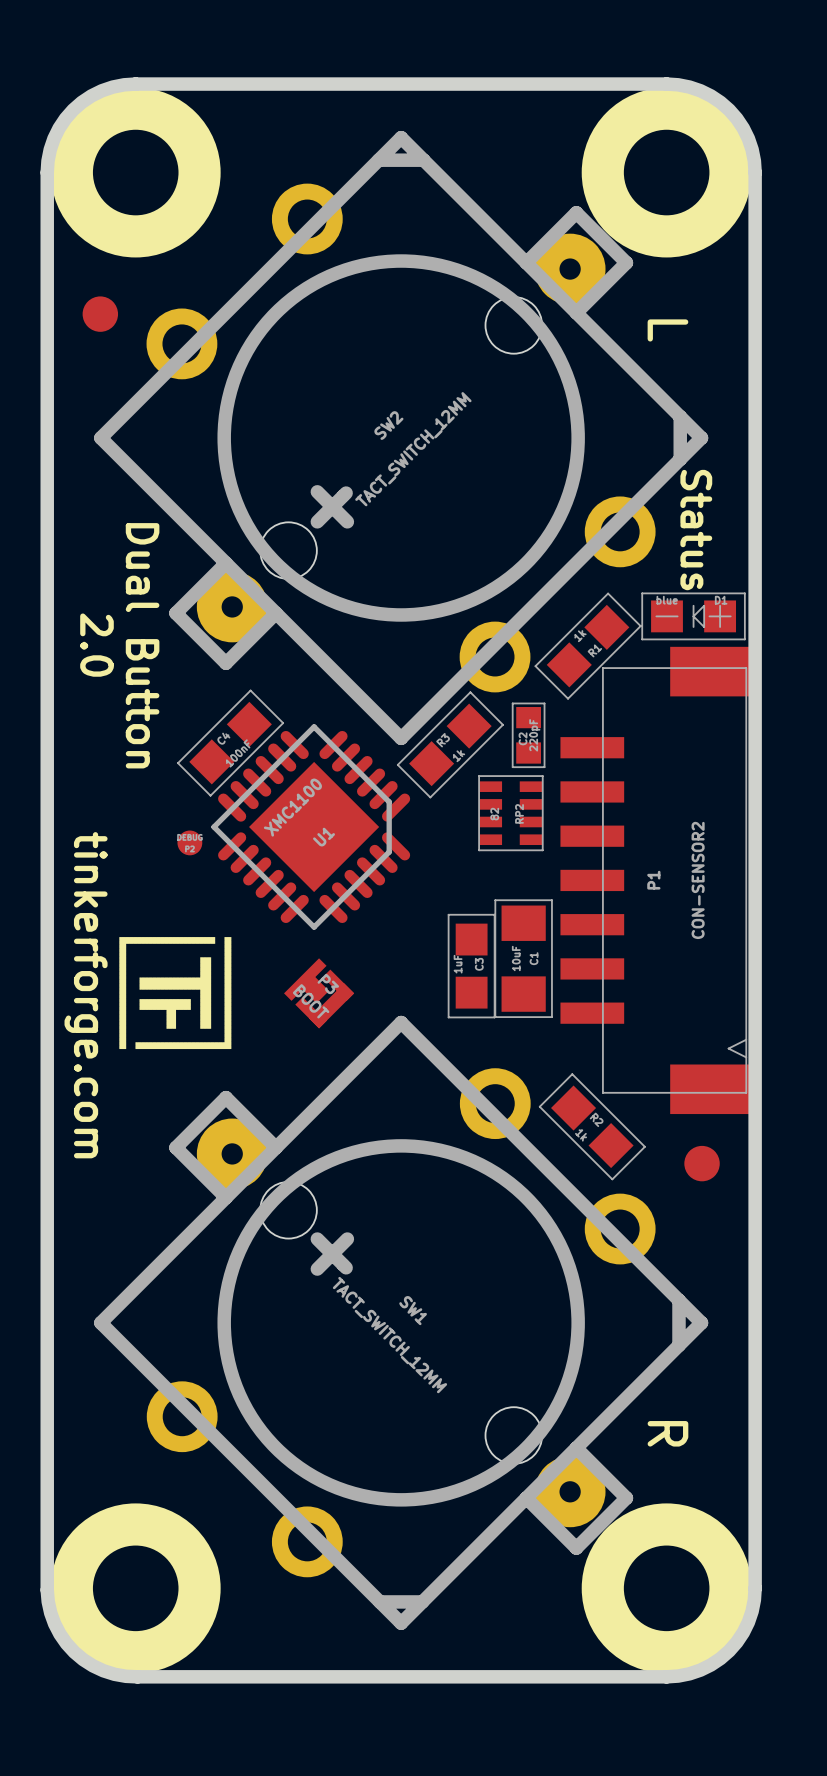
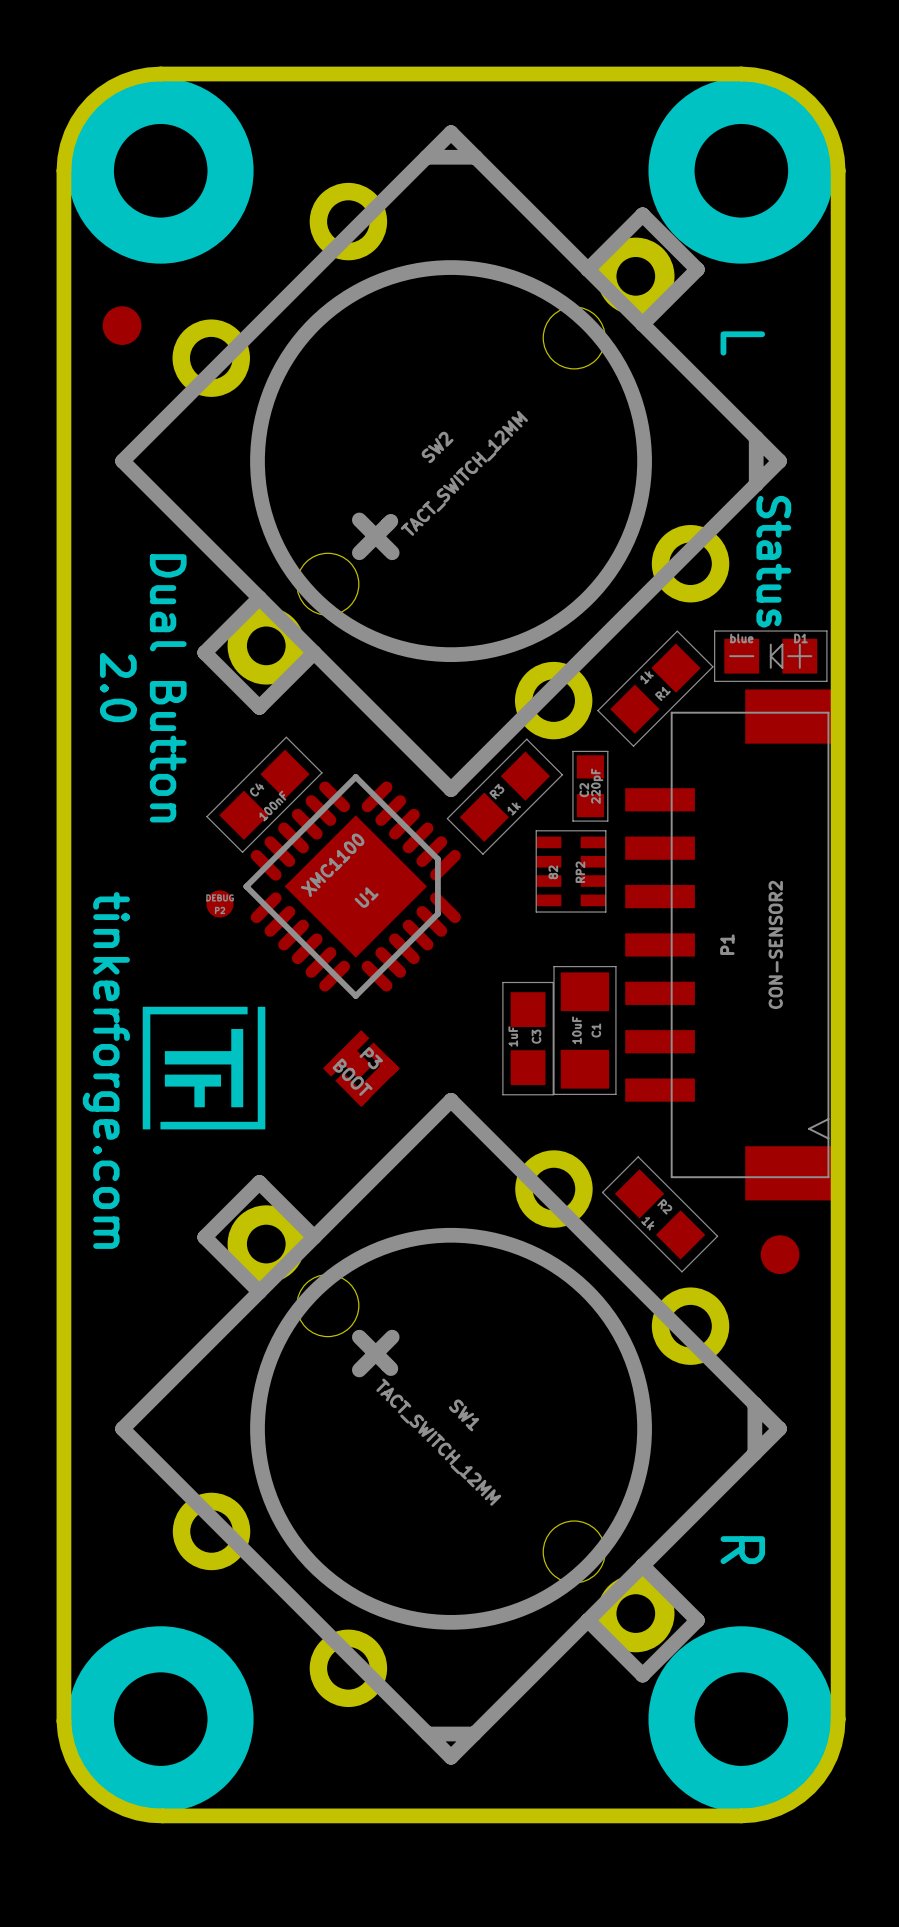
SW2 footprint: [94, 130, 709, 746] -> [115, 125, 787, 797]
SW1 footprint: [94, 1015, 709, 1630] -> [115, 1092, 787, 1765]

